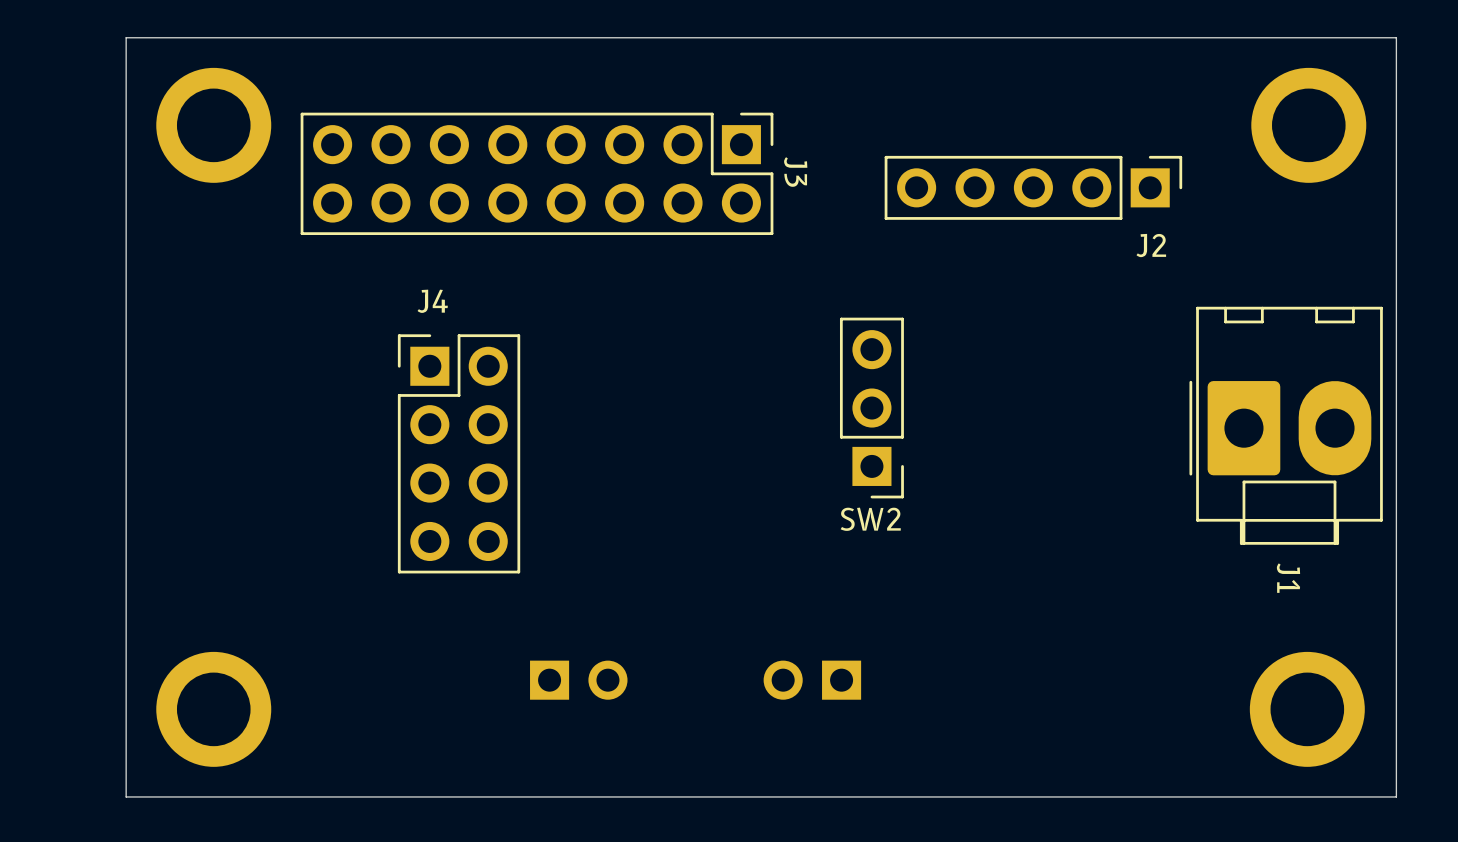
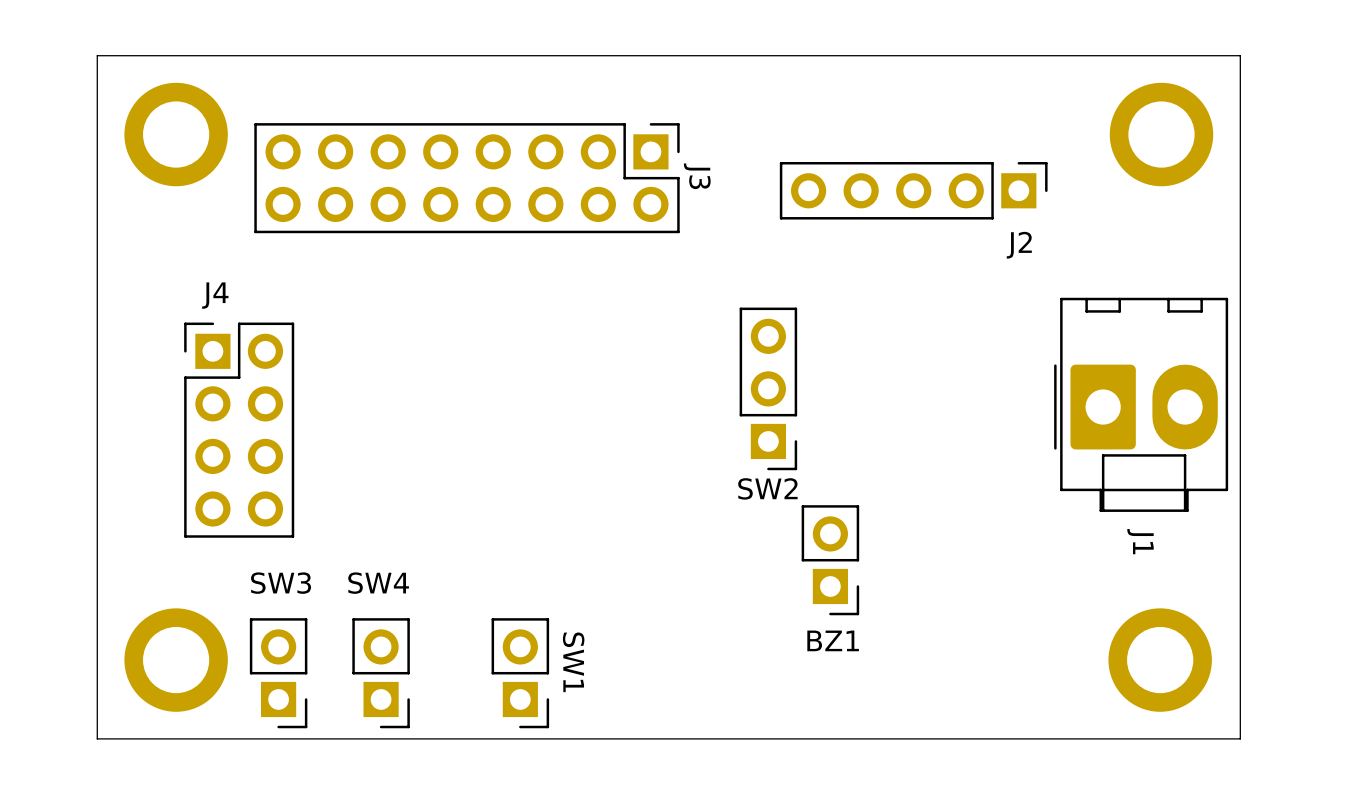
J4 position: (459, 453) -> (239, 430)
BZ1: none -> (830, 560)
SW3 side: top (578, 680) -> bottom (278, 673)
SW1 side: top (812, 680) -> bottom (520, 673)
SW4: none -> (381, 673)

